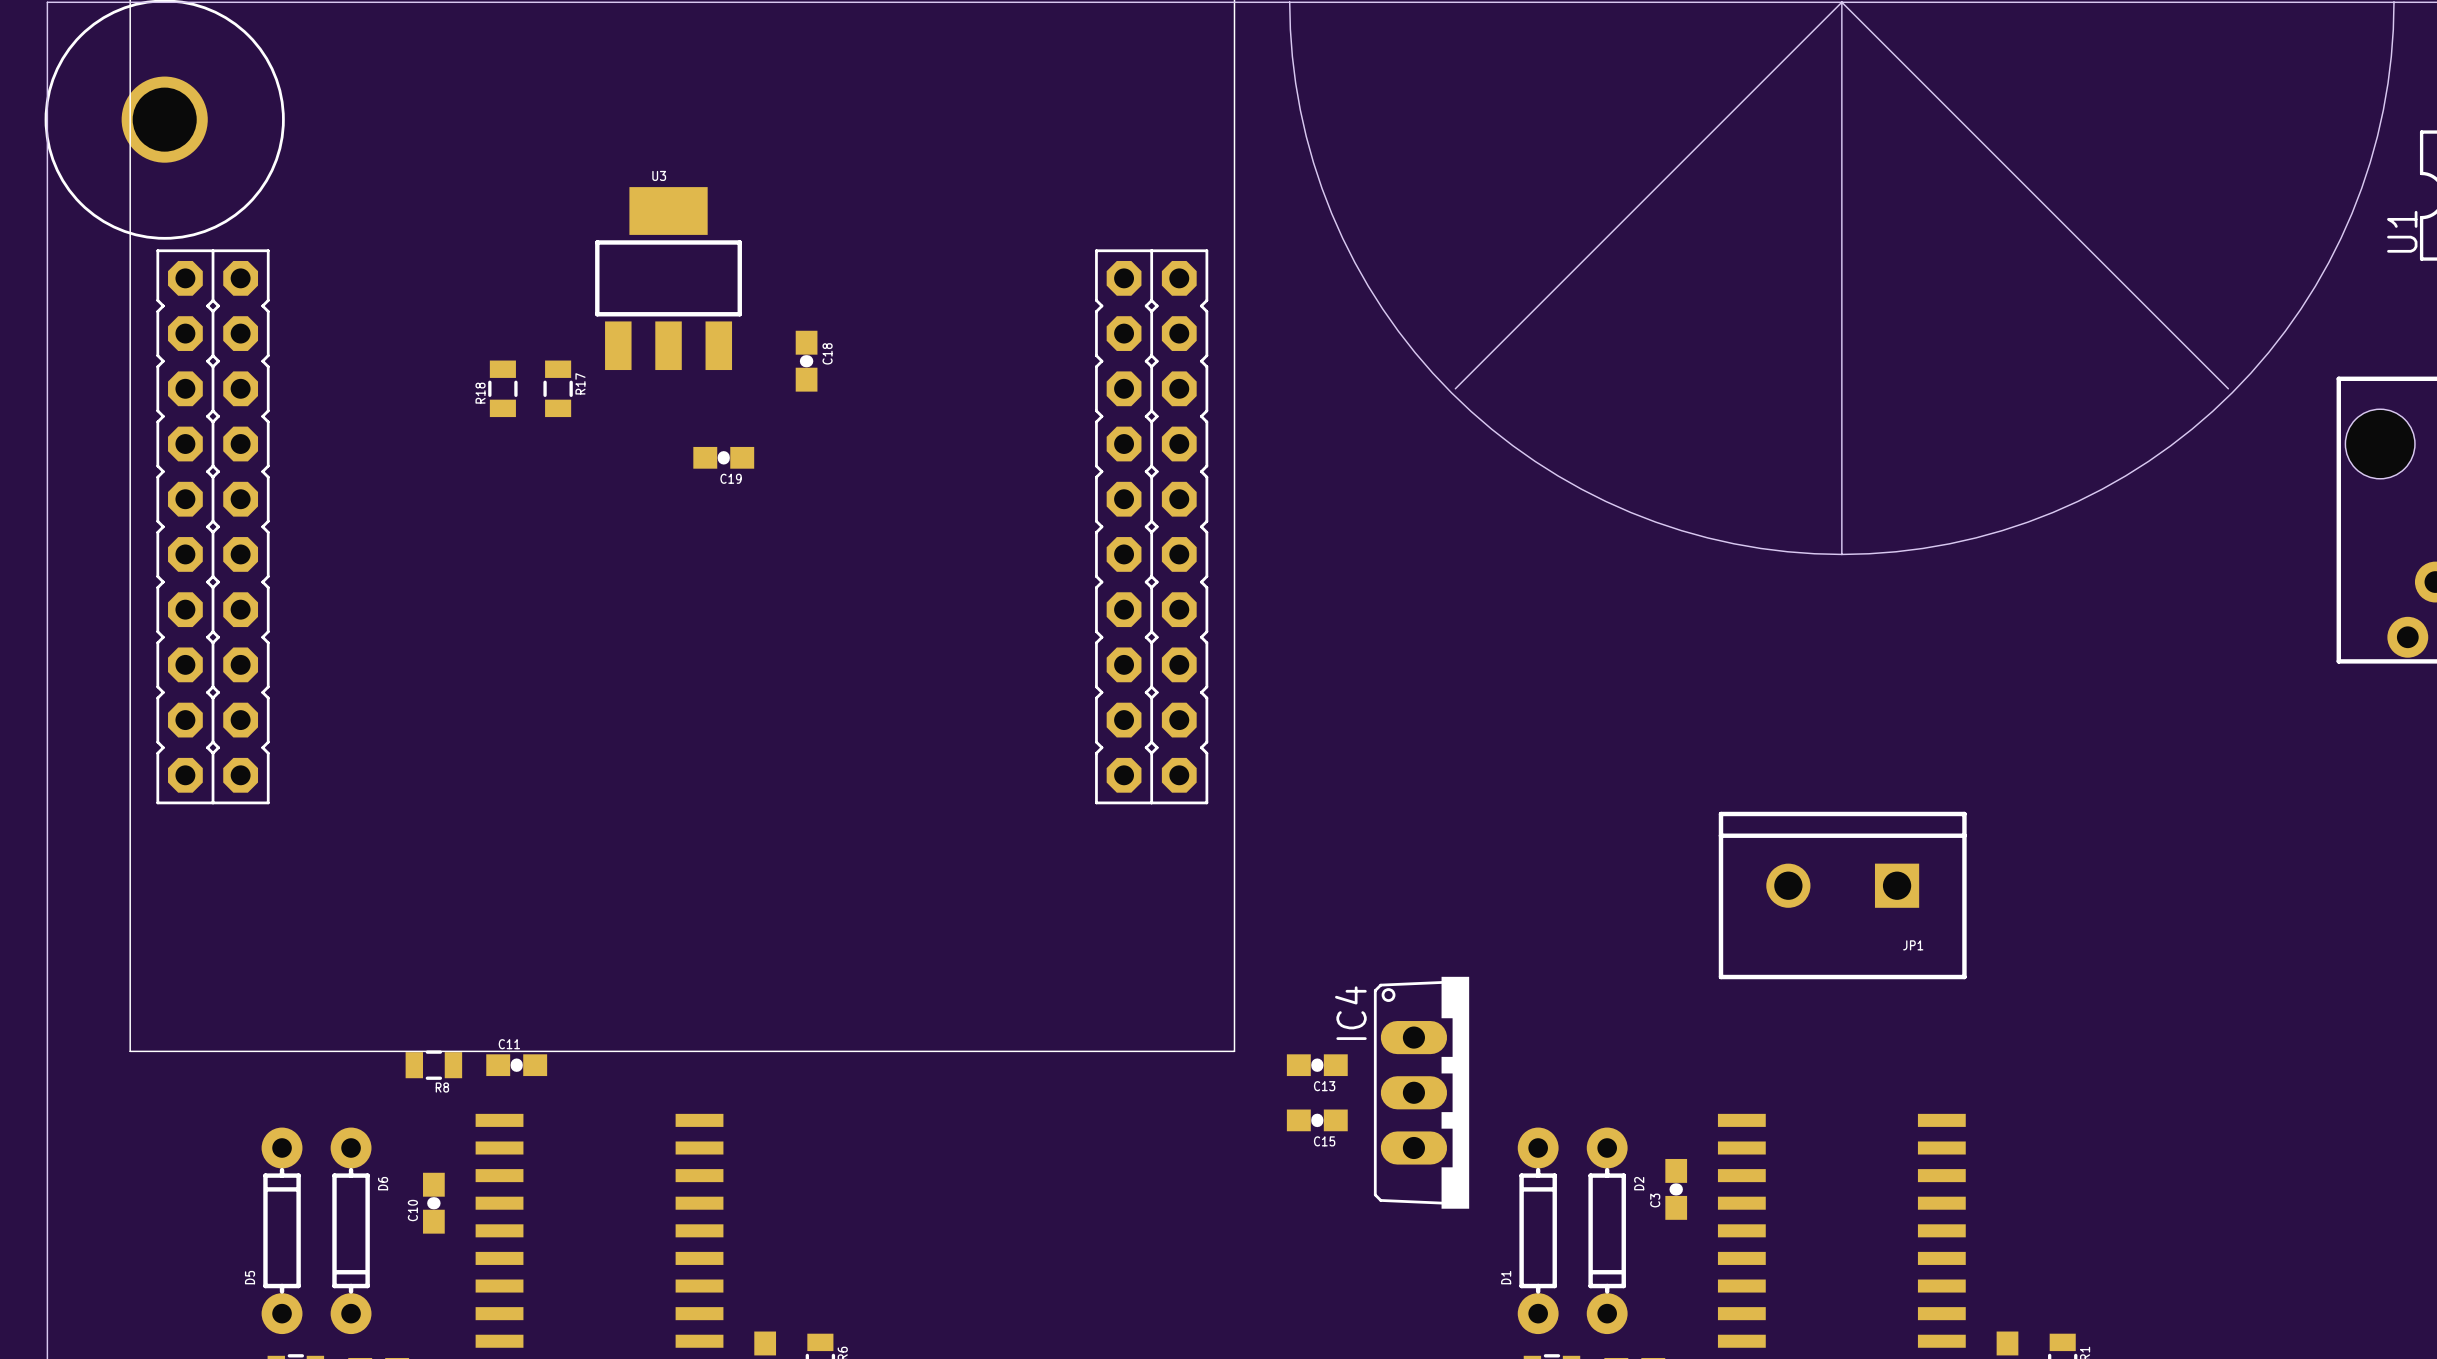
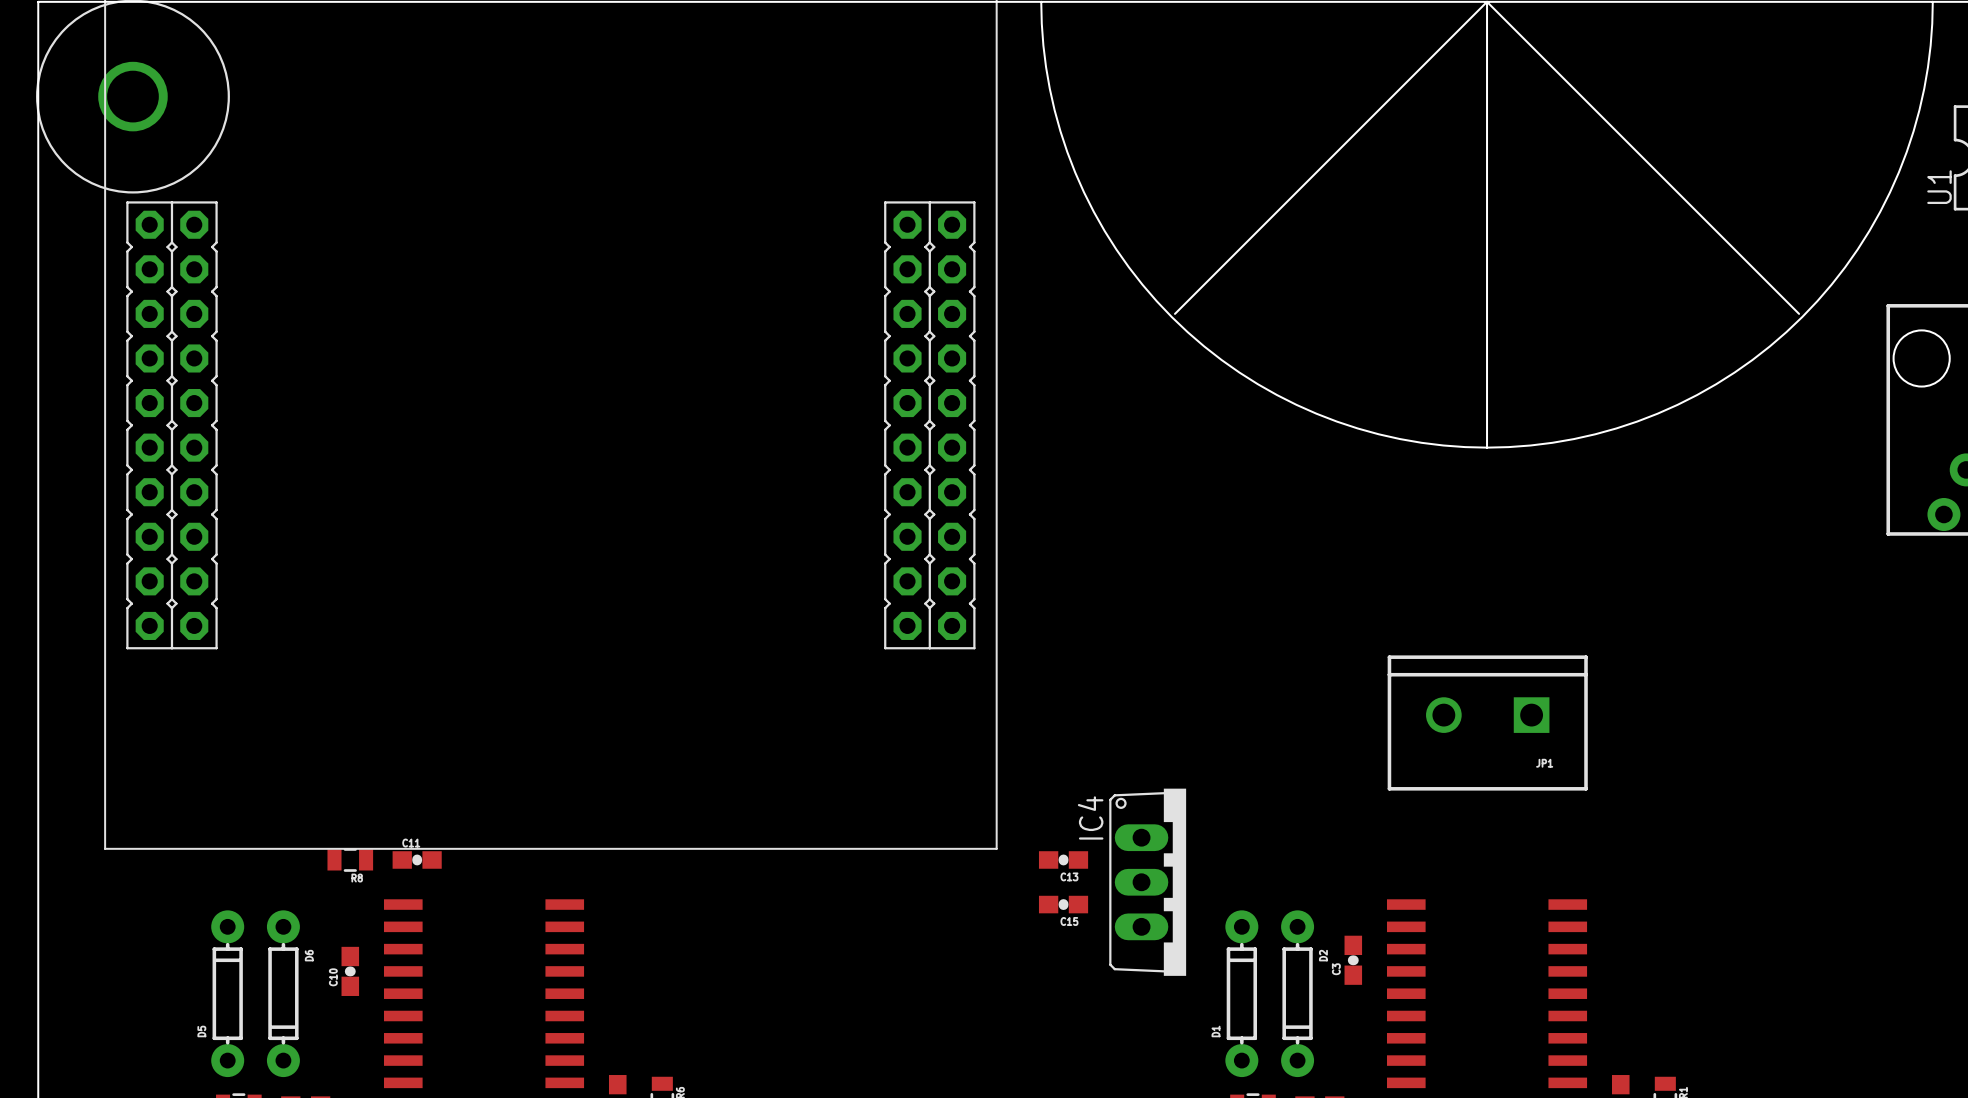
U3: (668, 278) -> none
C18: (806, 361) -> none
R18: (502, 388) -> none
R17: (558, 388) -> none
C19: (723, 457) -> none

